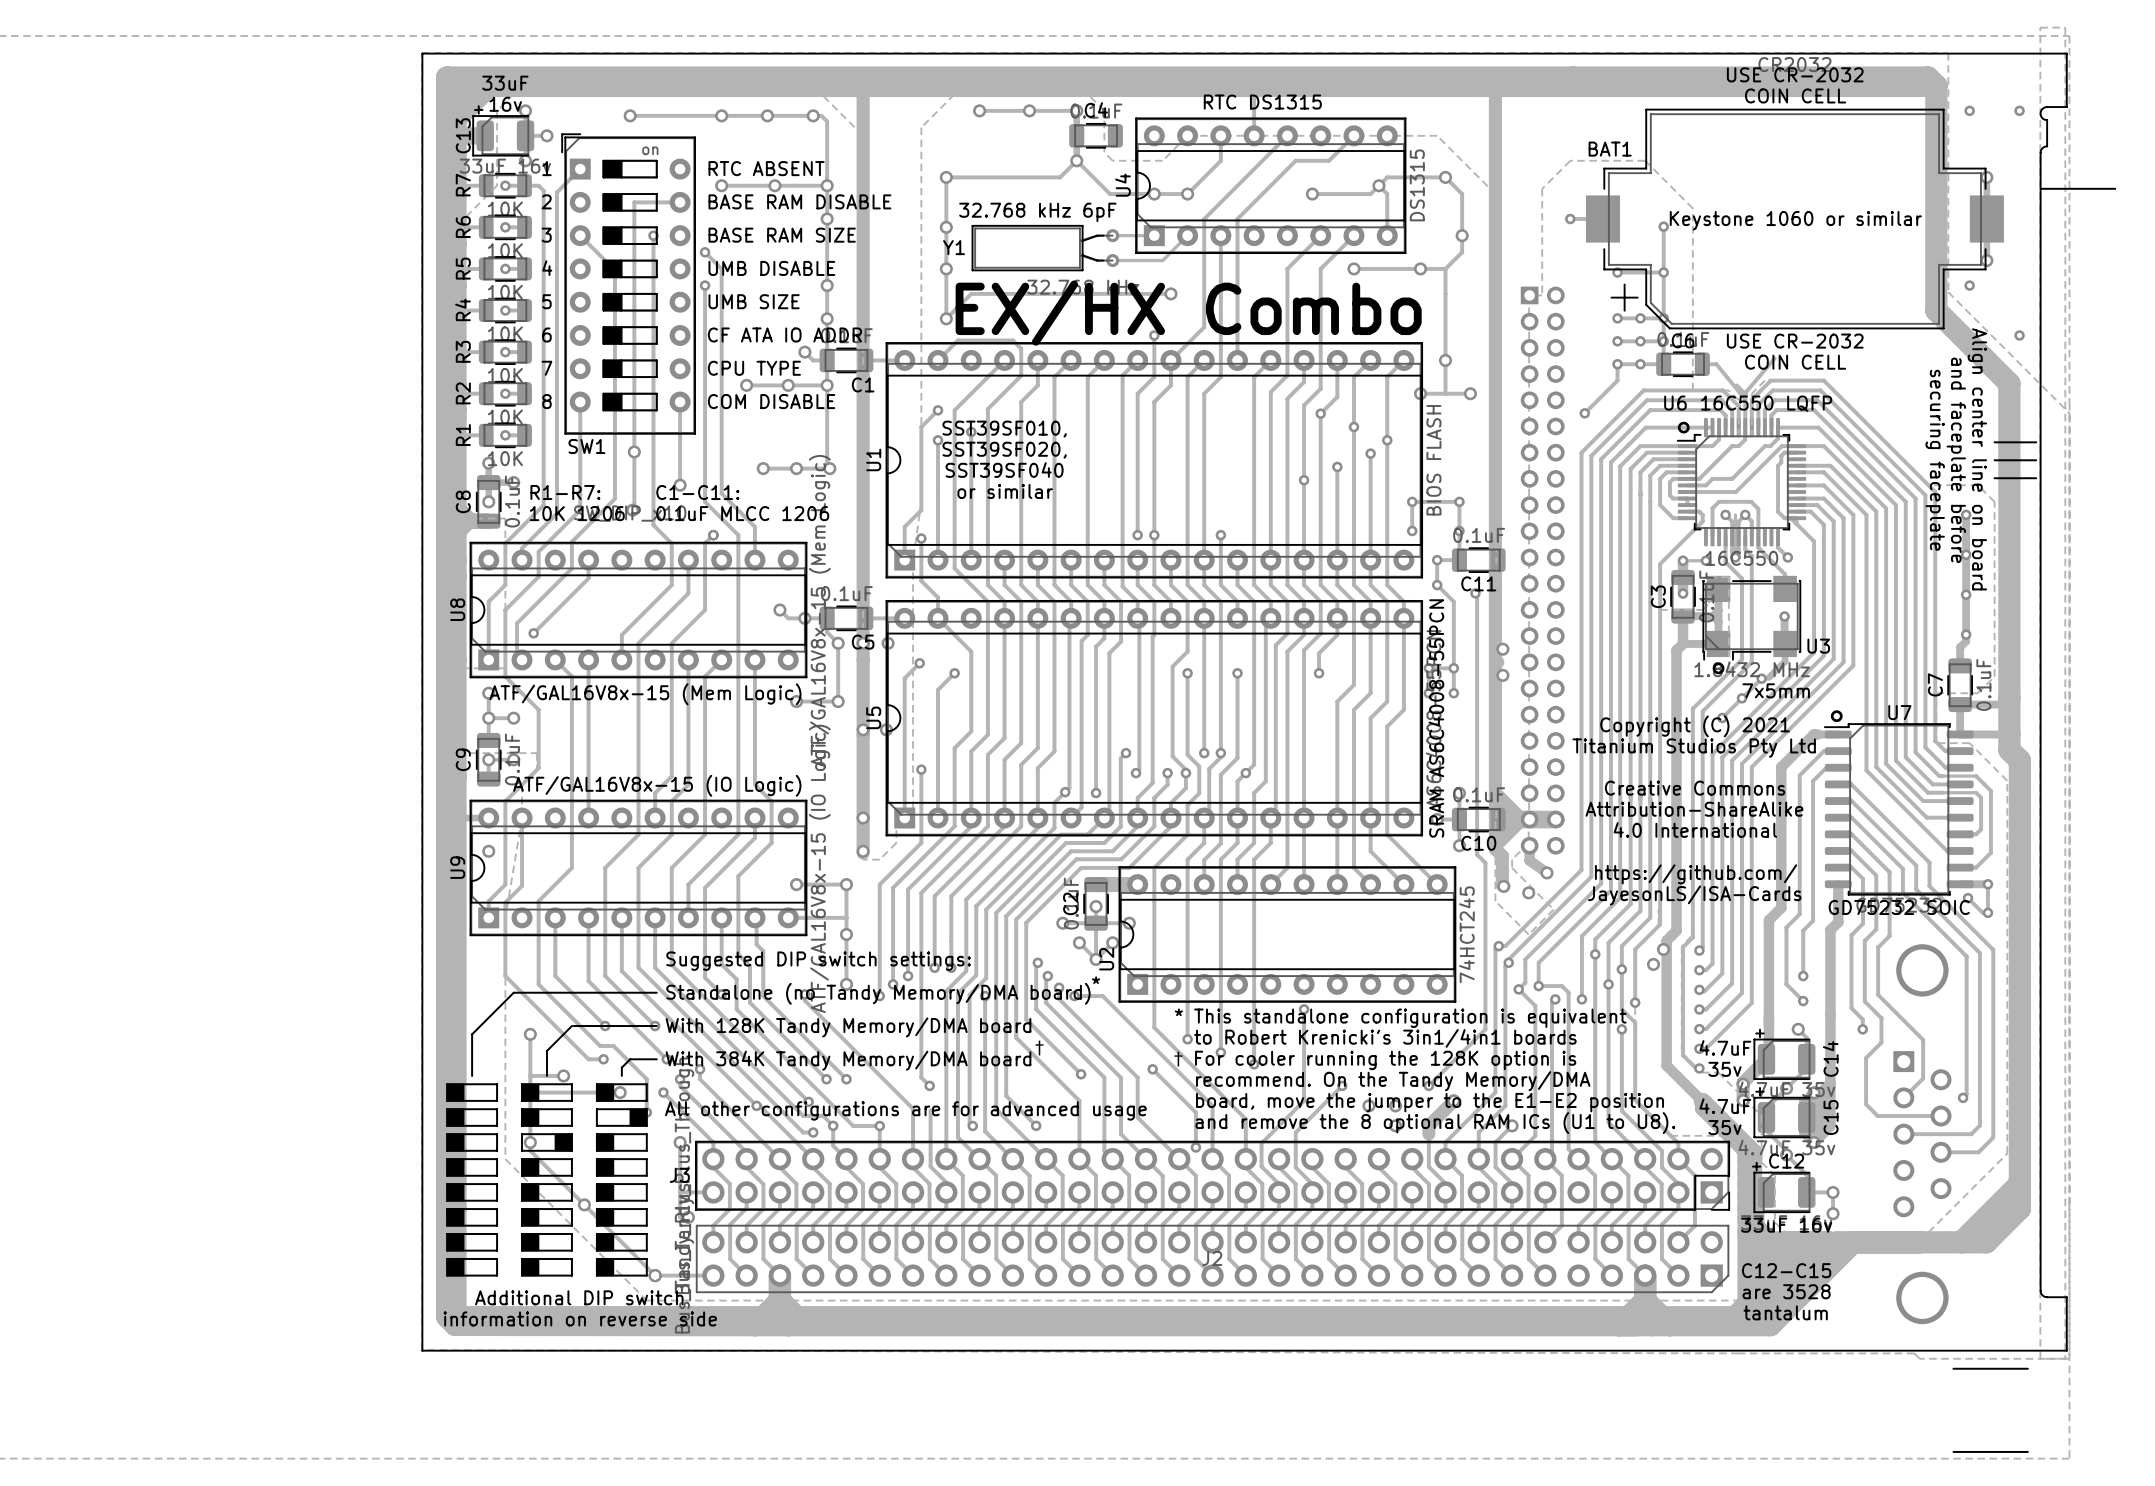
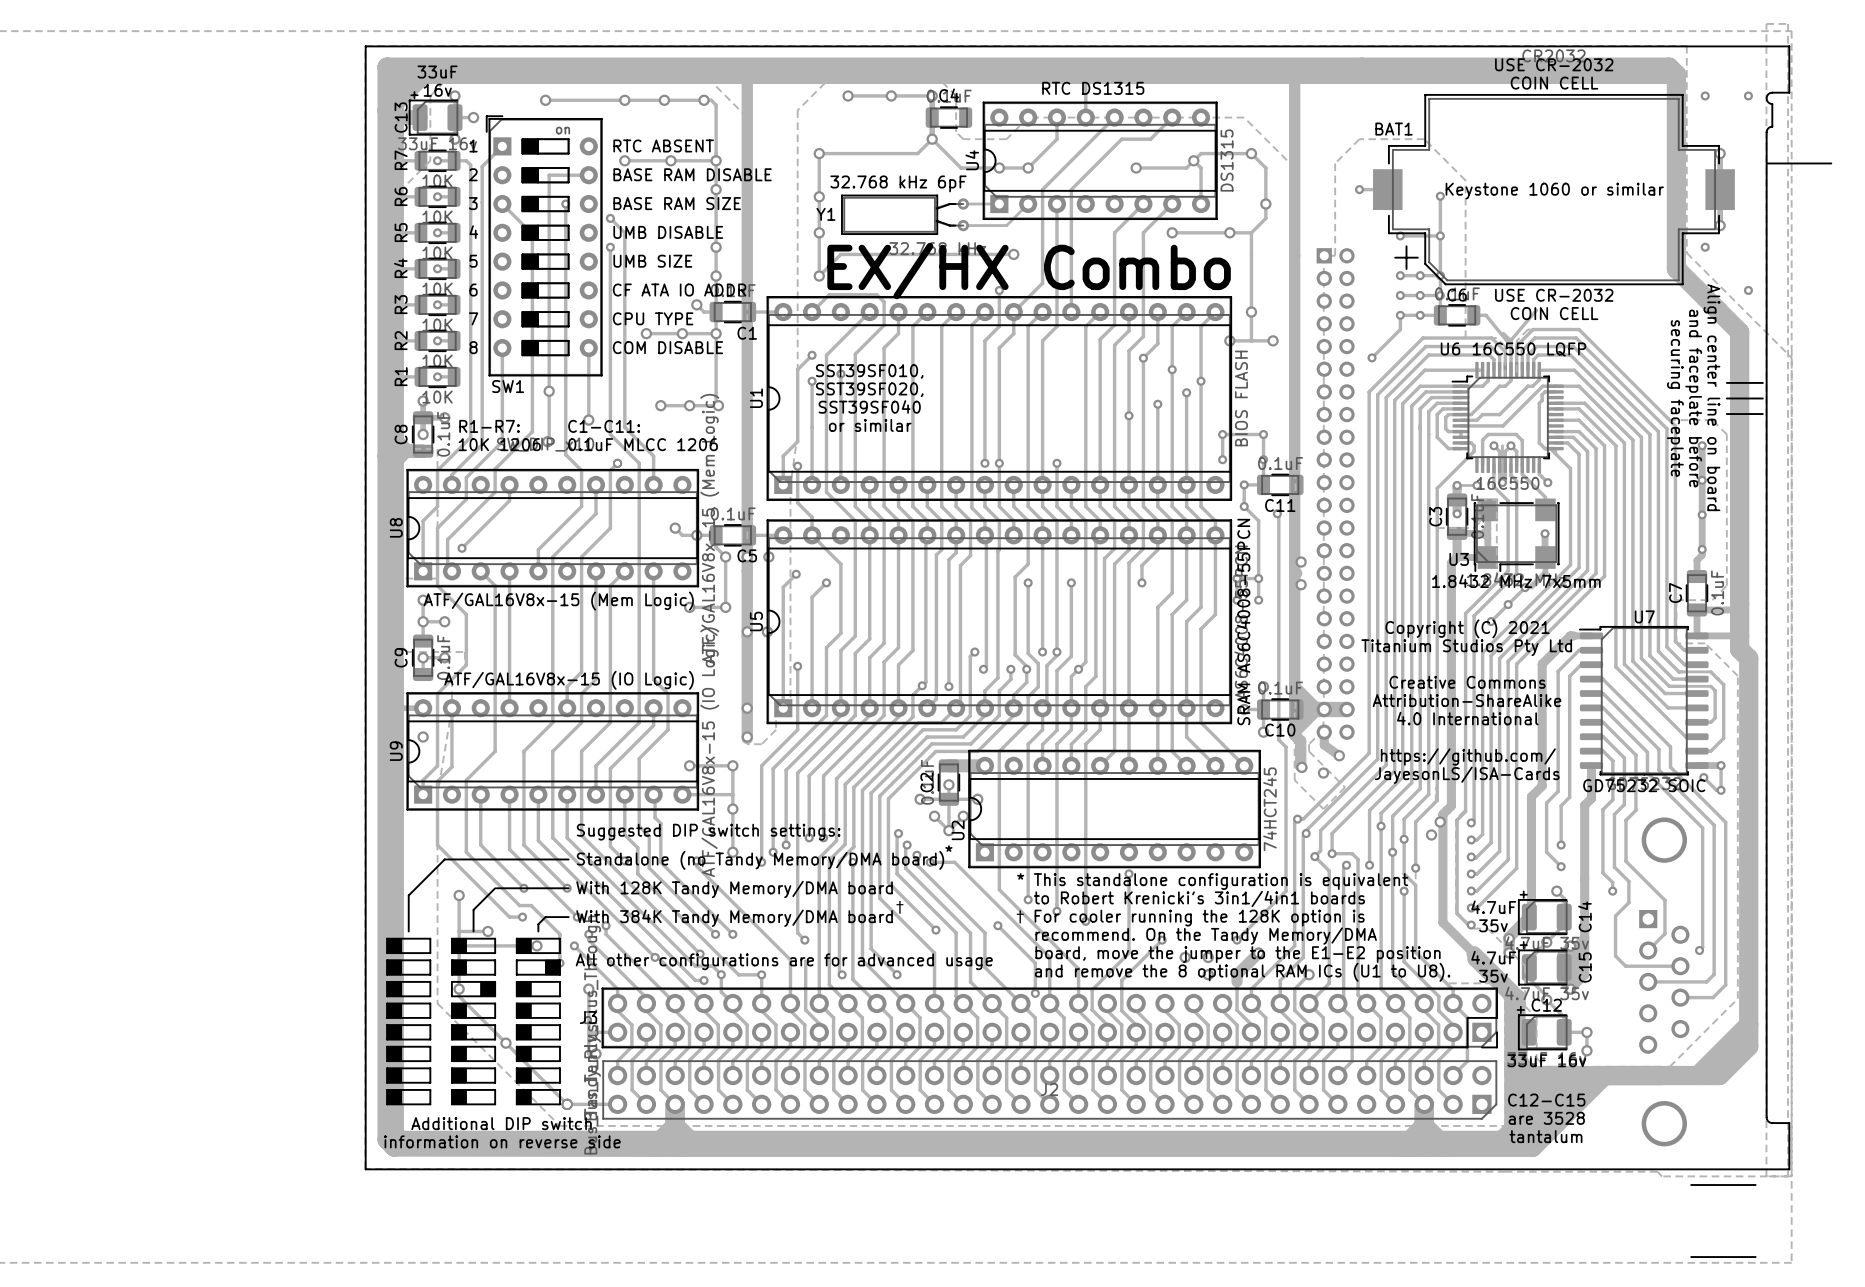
U6 footprint: [1677, 417, 1807, 547] -> [1451, 361, 1564, 474]
U3 footprint: [1702, 575, 1802, 675] -> [1474, 498, 1560, 572]
U3 name position: U3 (1818, 646) -> U3 (1459, 559)
U7 footprint: [1824, 710, 1974, 896] -> [1579, 626, 1709, 776]

